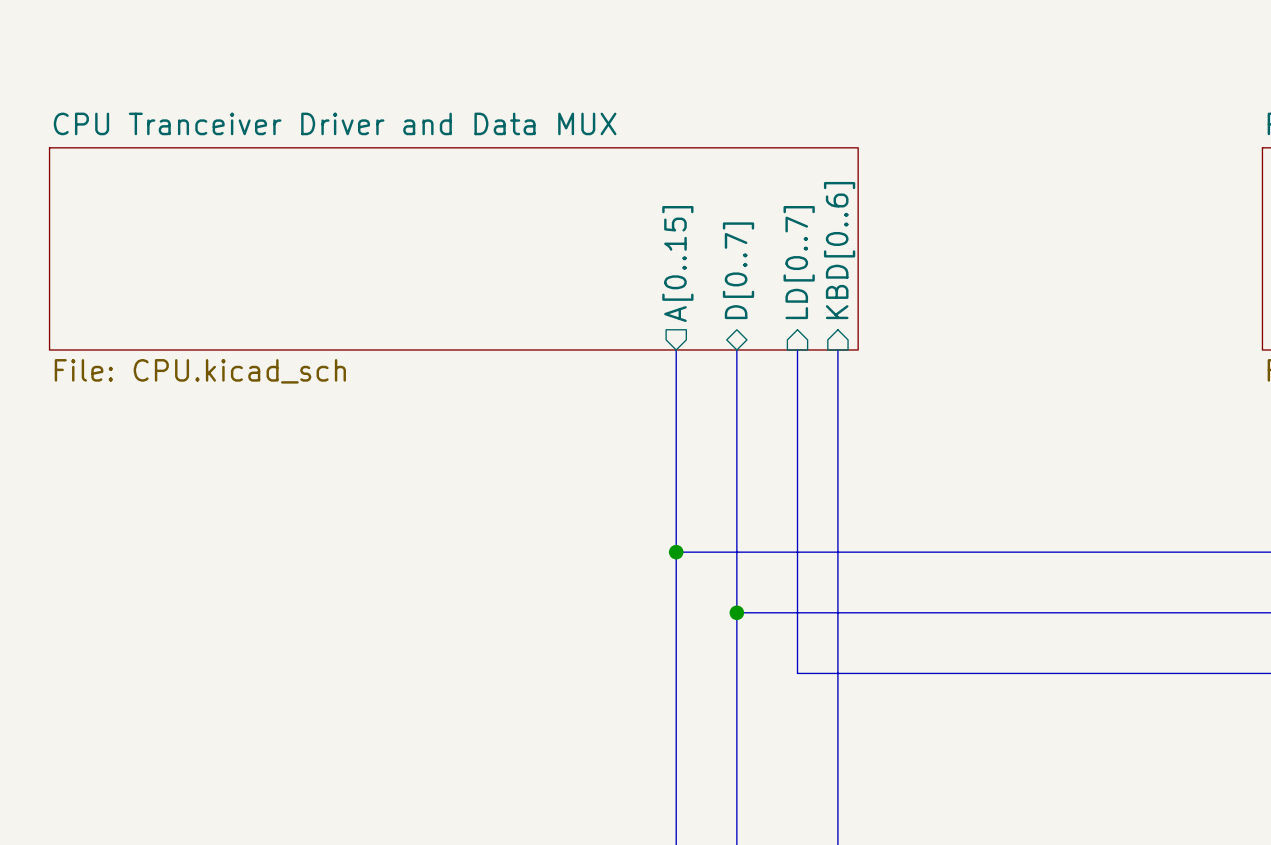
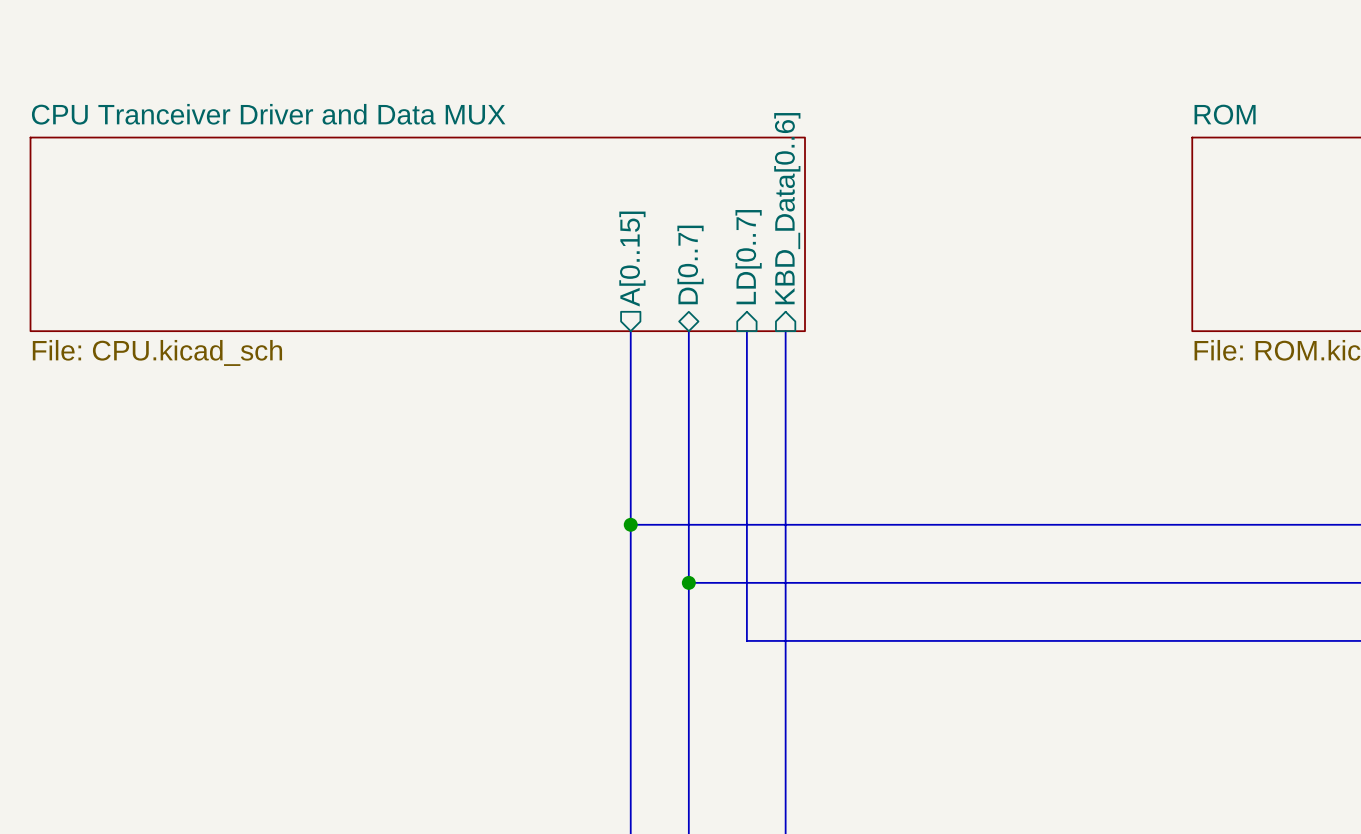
sheet pin: KBD[0..6] (839, 250) -> KBD_Data[0..6] (787, 208)

